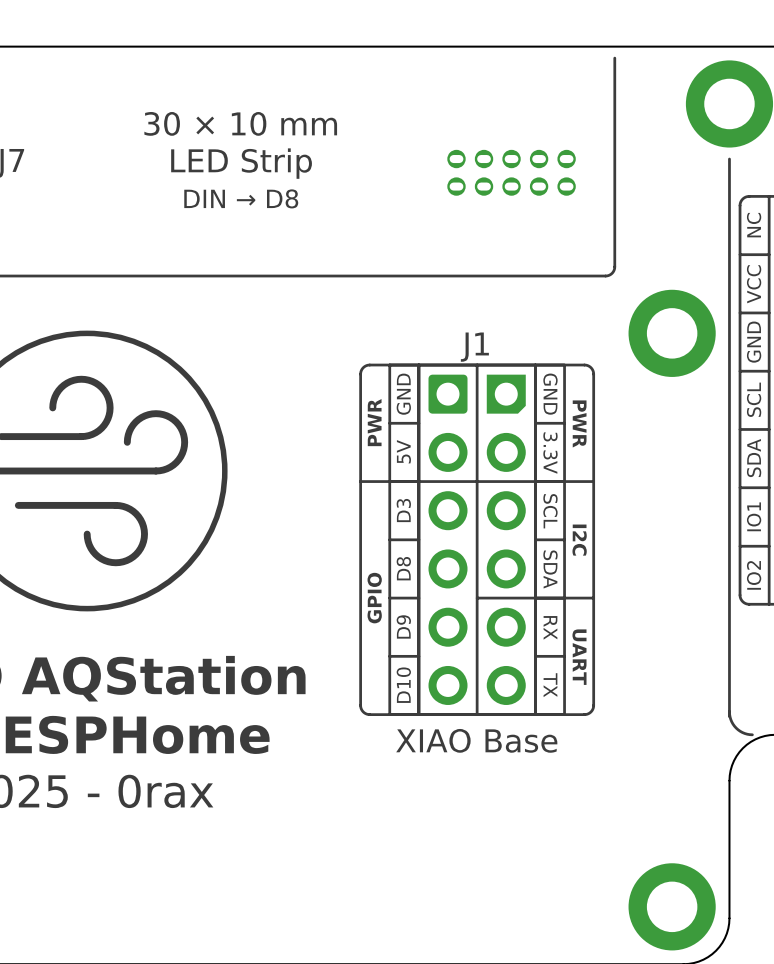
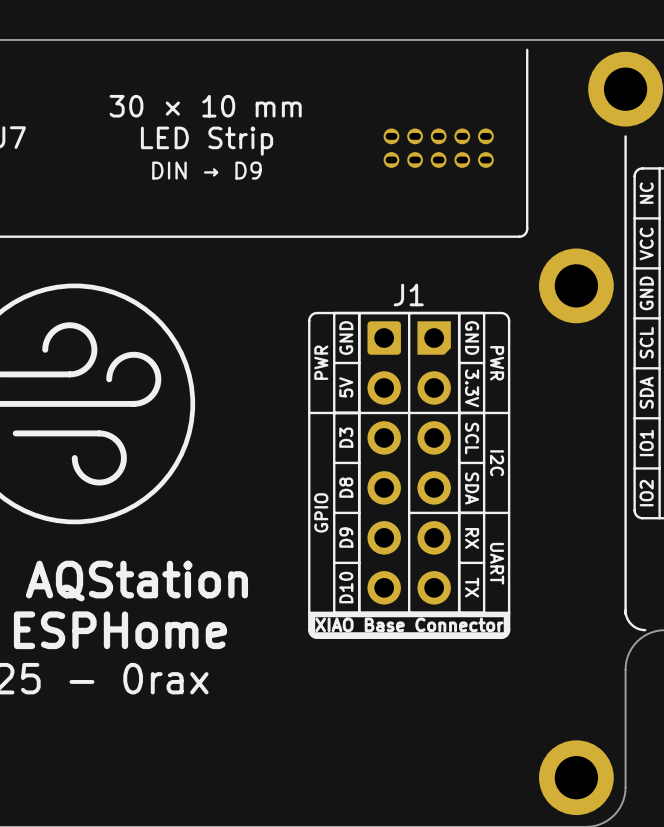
text: DIN → D8 (241, 198) -> DIN → D9 (206, 170)
J1 footprint: [359, 363, 596, 716] -> [308, 311, 511, 639]
drawing: none -> [309, 612, 510, 638]
text: XIAO Base (476, 740) -> none

